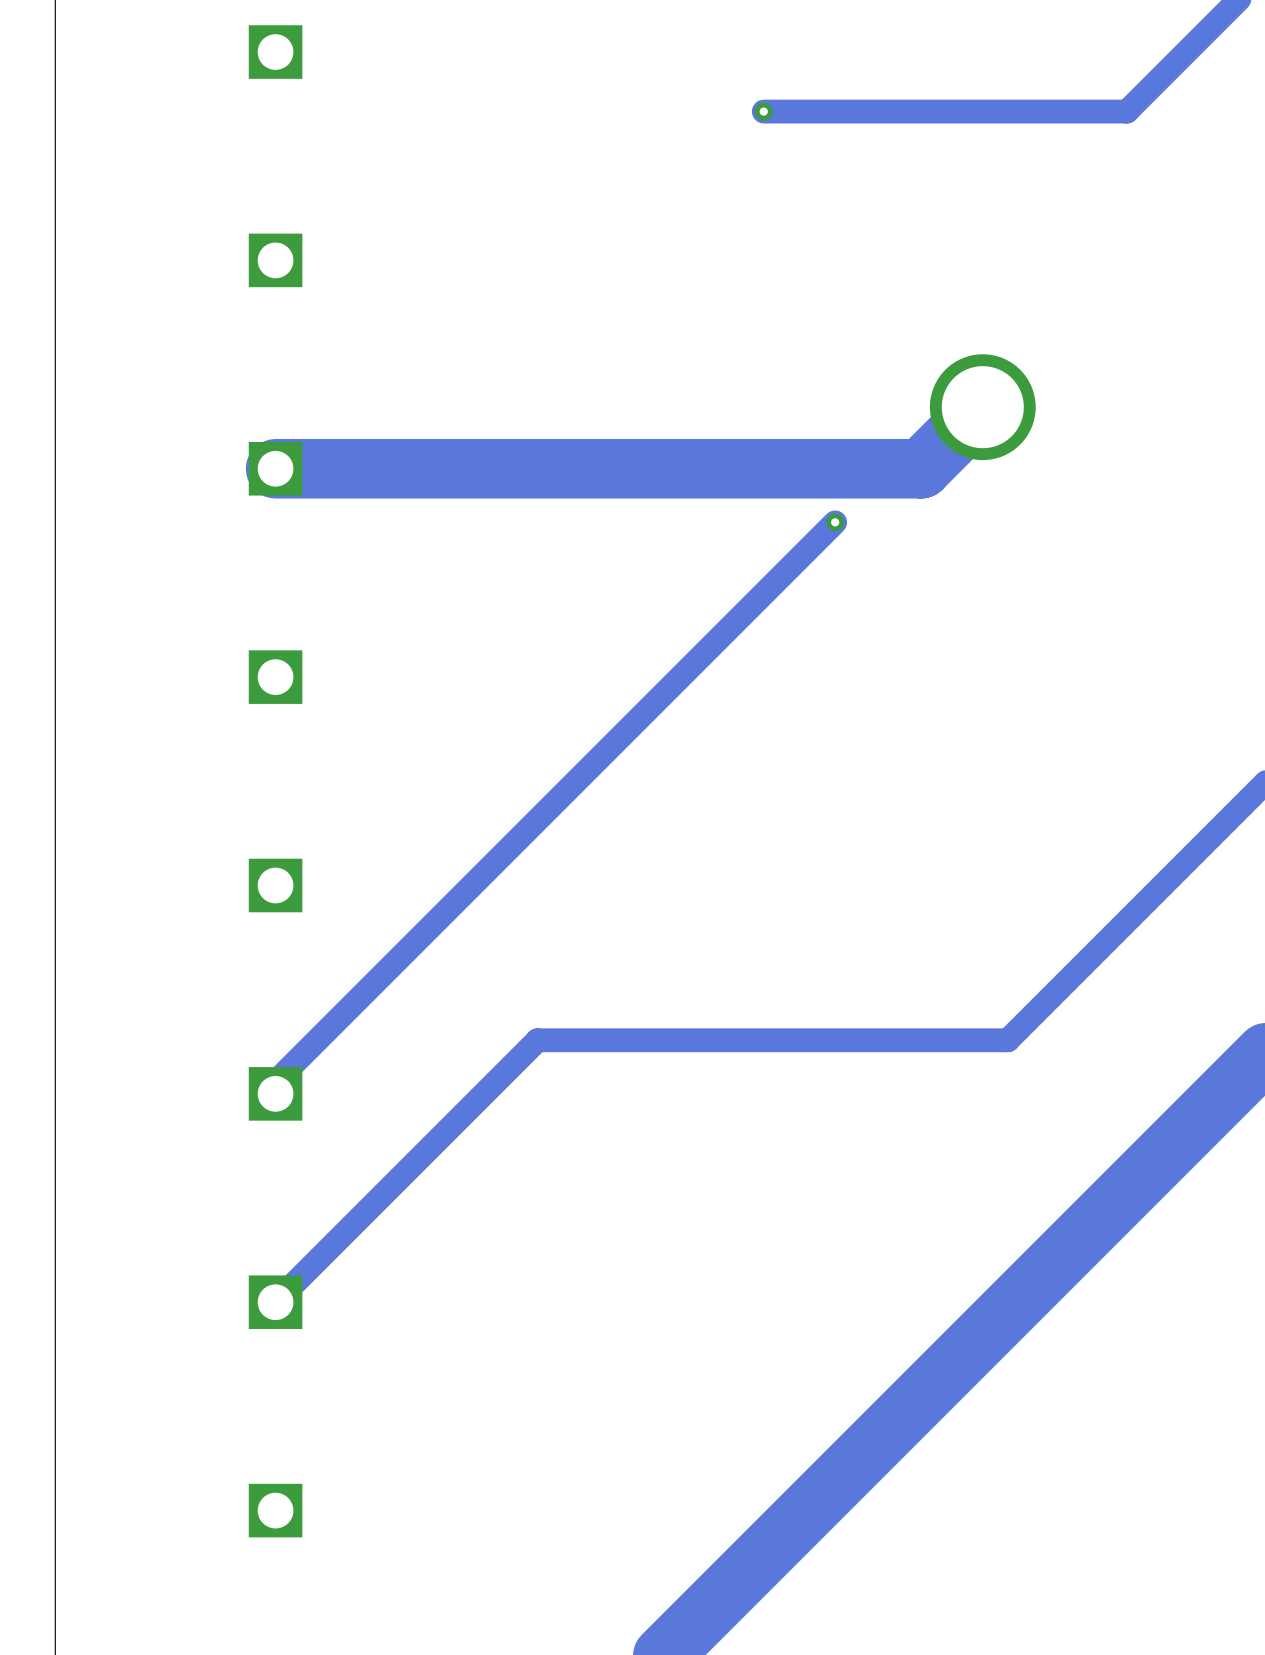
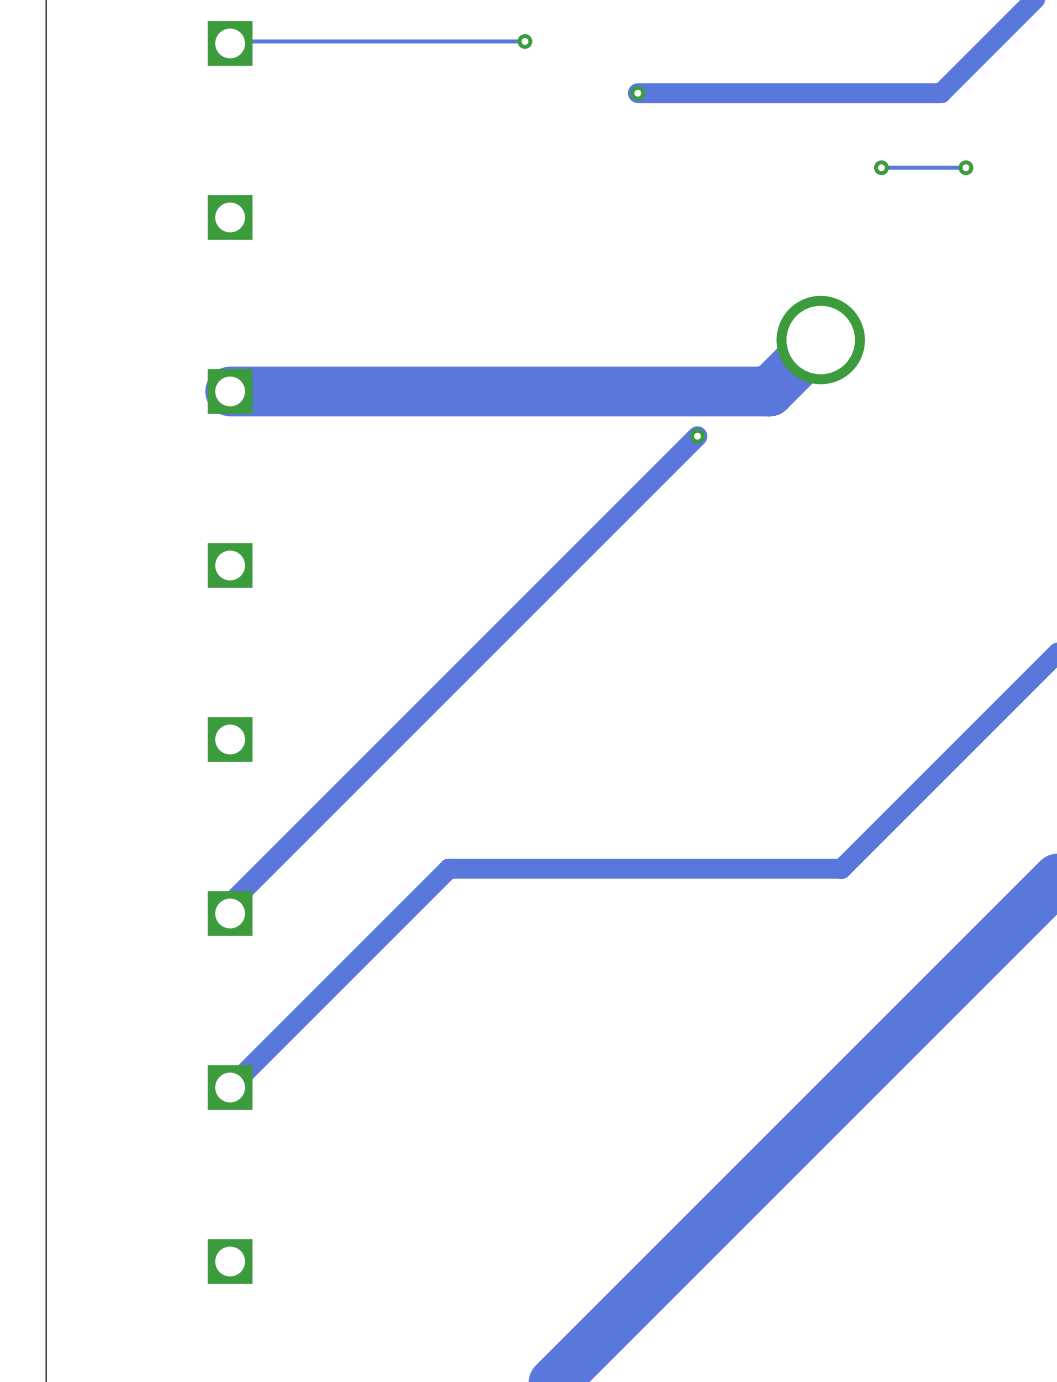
track: none -> (524, 41) (232, 41) (230, 43)
via: none -> (524, 41)
via: none -> (881, 167)
track: none -> (965, 167) (881, 167)
via: none -> (965, 167)

